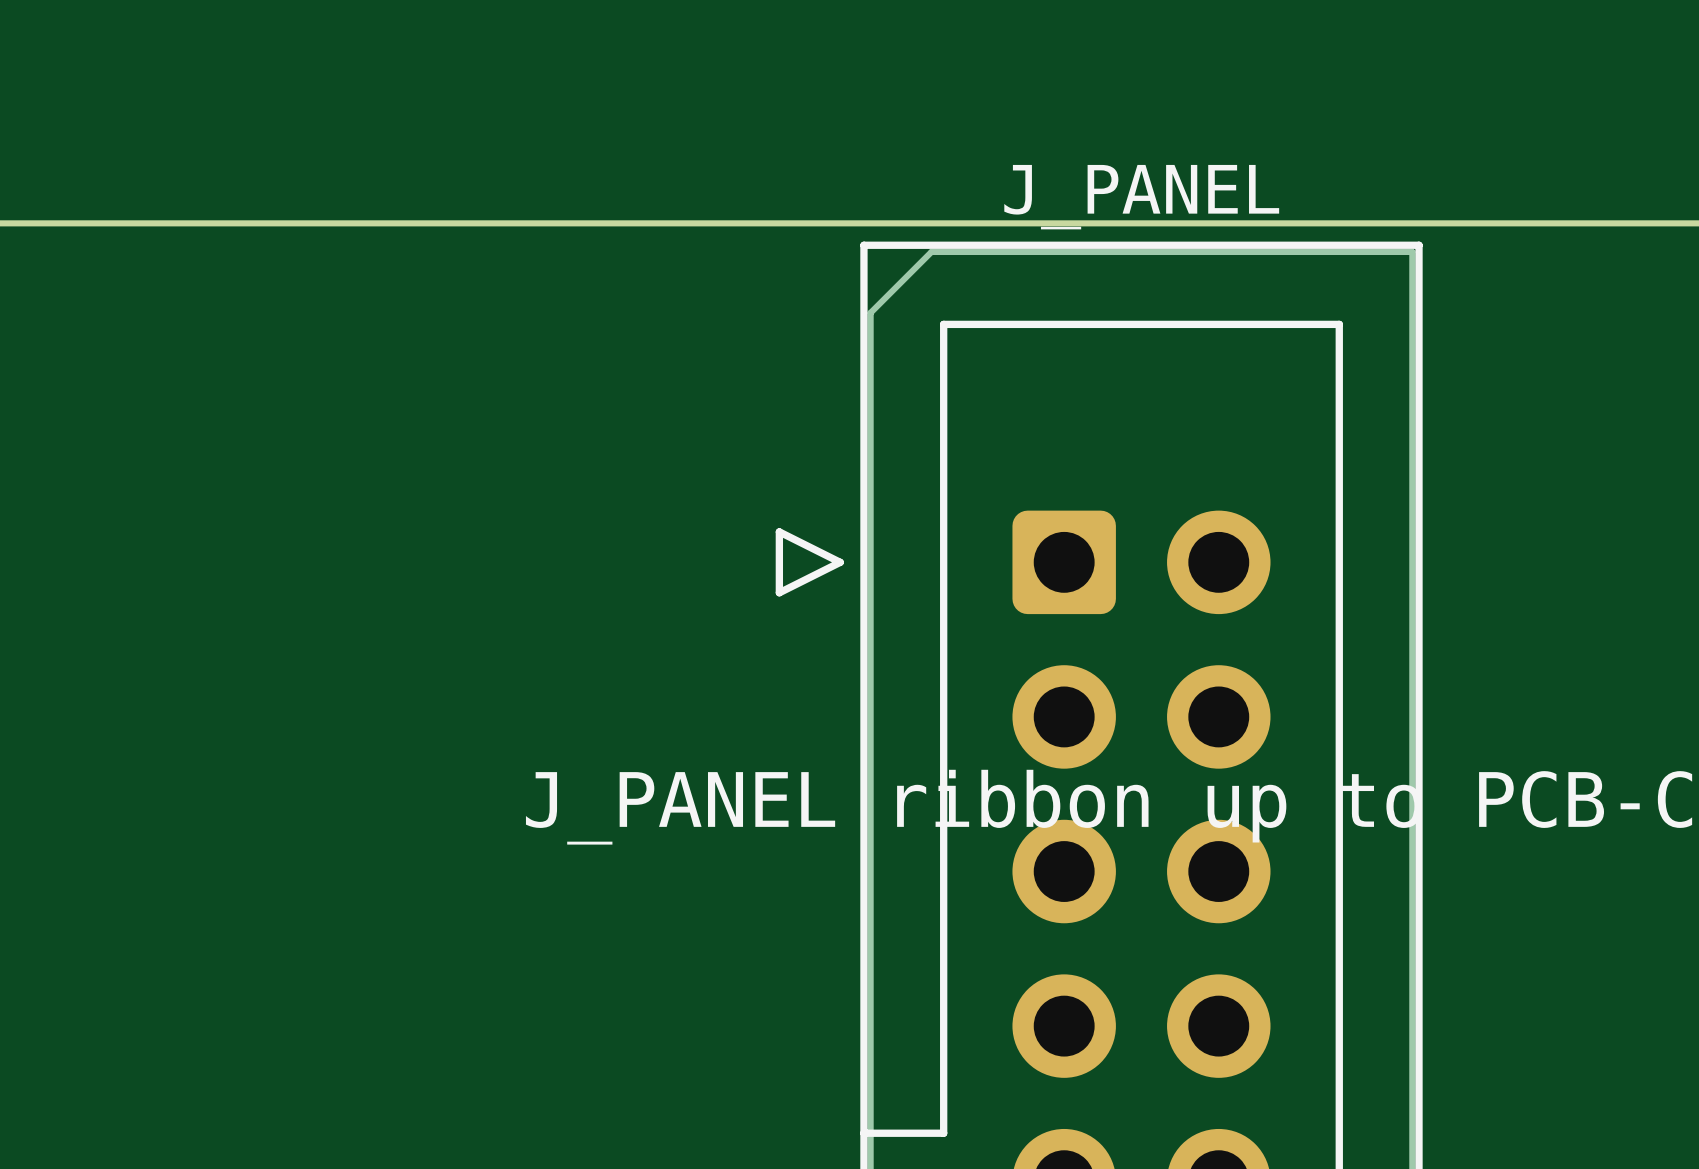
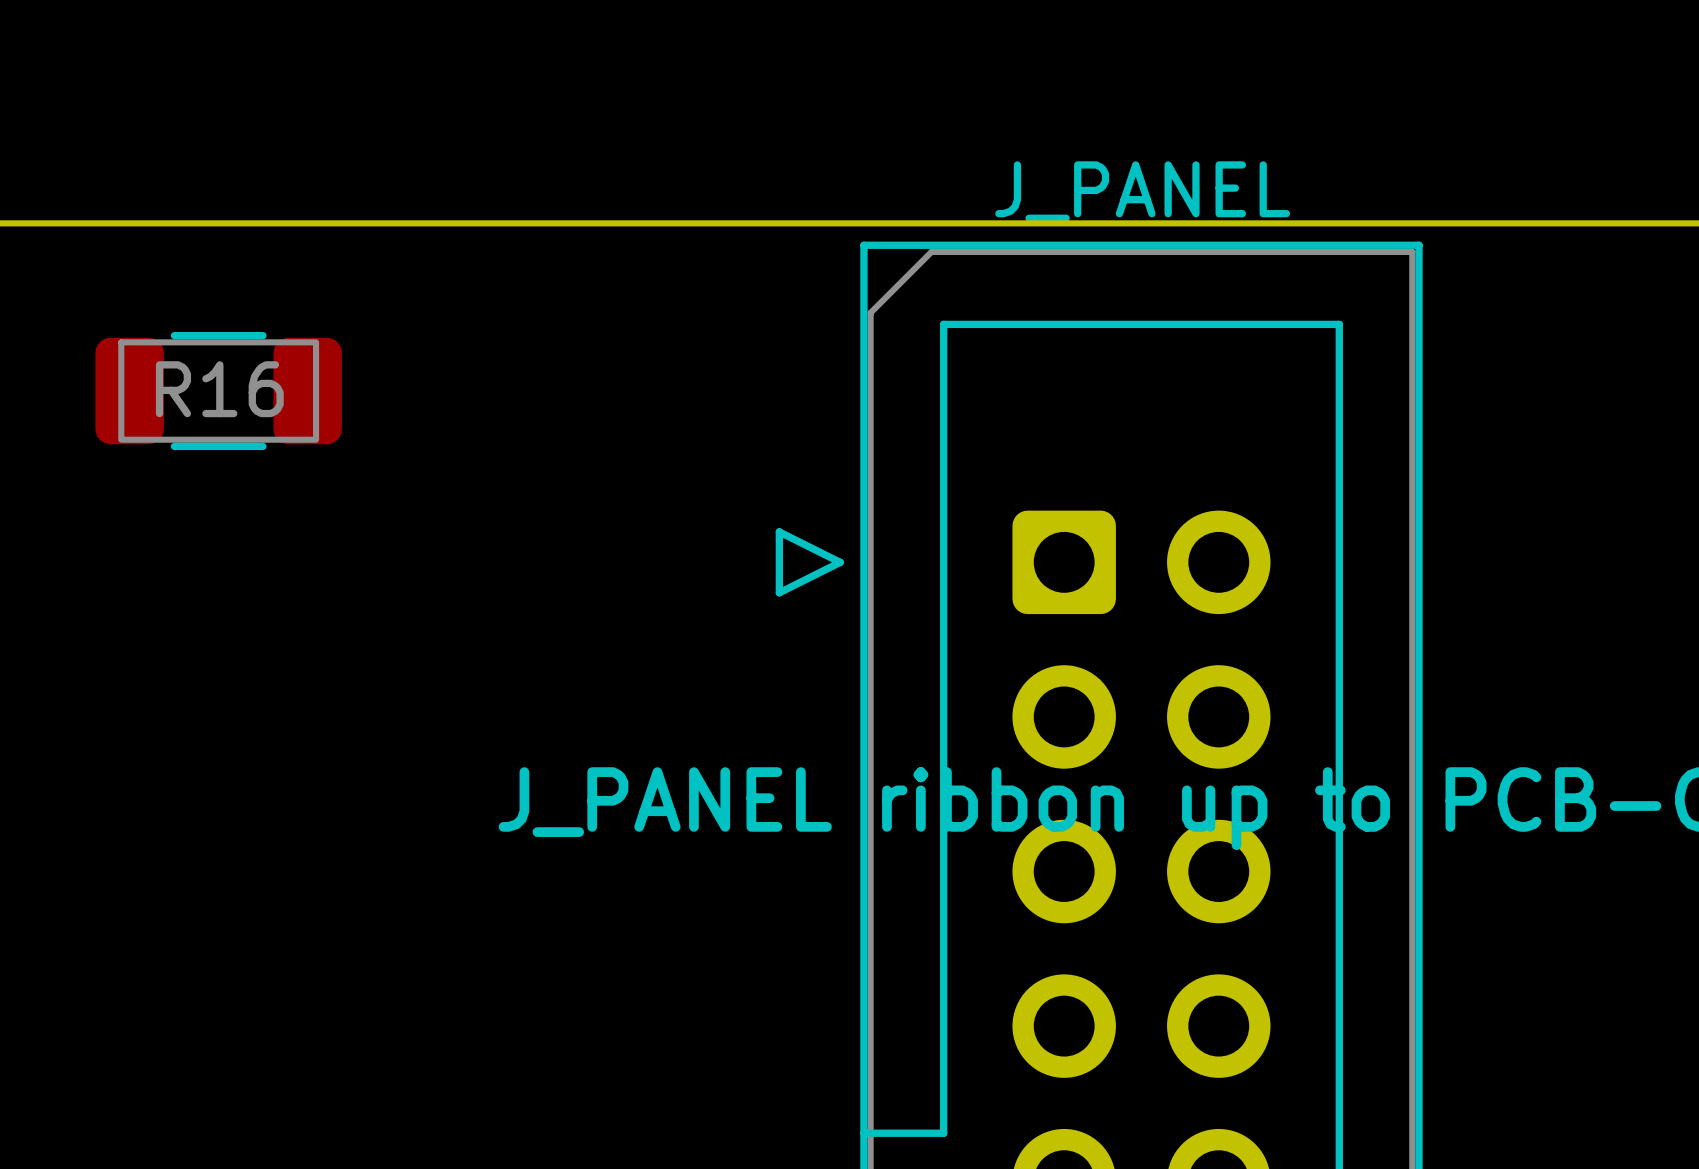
R16: none -> (218, 391)

